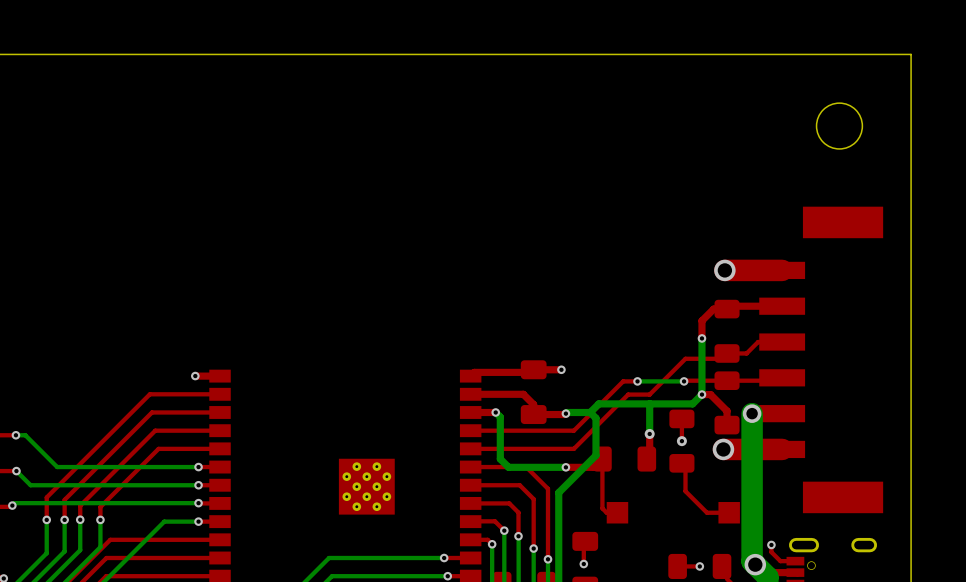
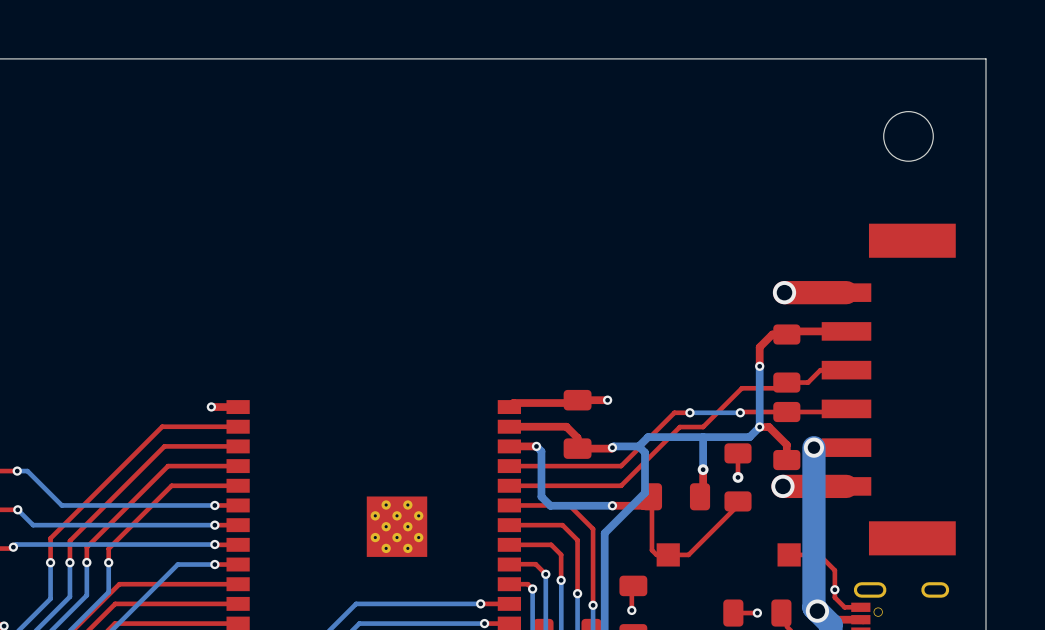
top track: (685, 463) (685, 491) (706, 512) (729, 512) -> none
top track: none -> (738, 505) (688, 554) (669, 554)
top track: none -> (790, 554) (819, 554) (834, 570) (834, 589)

